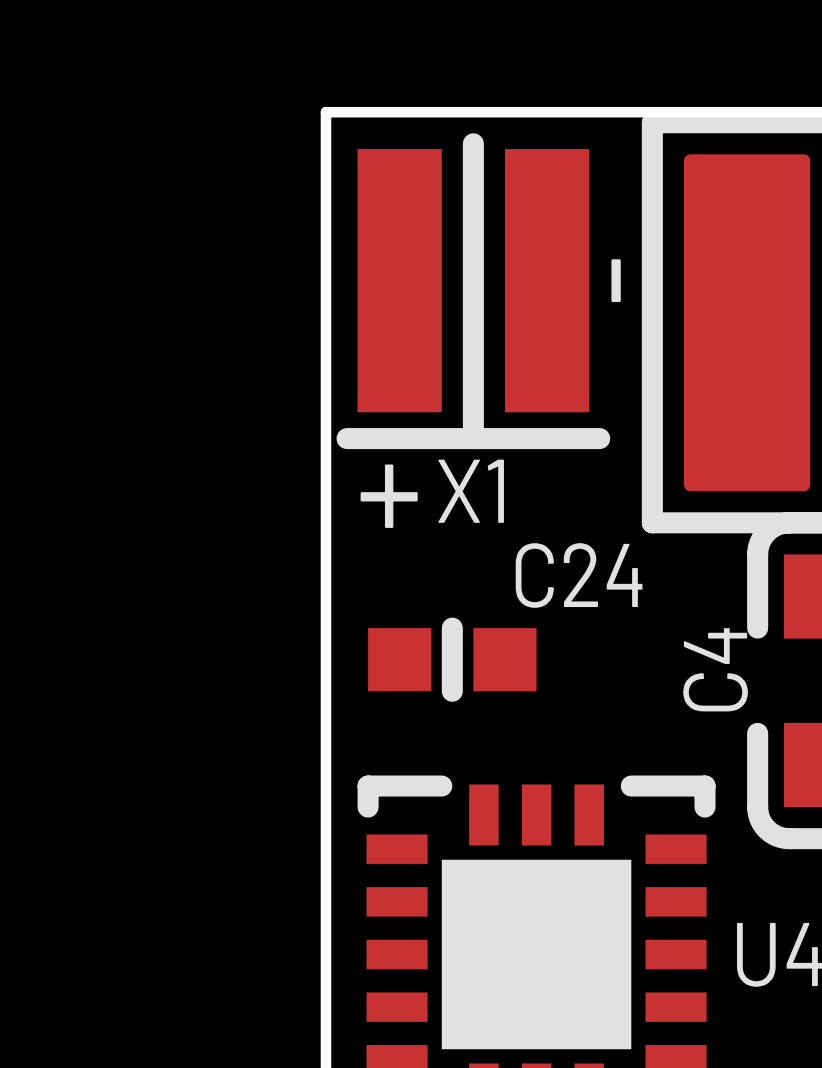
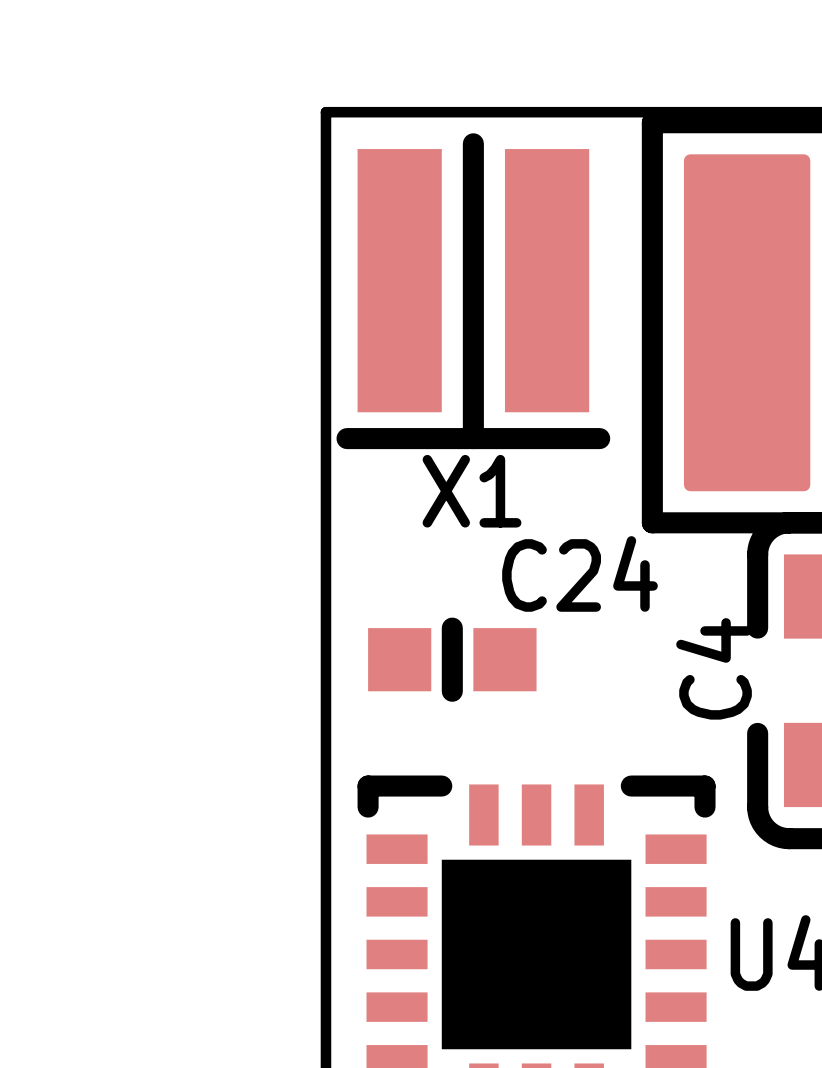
text: - (616, 280) -> none
text: + (389, 496) -> none

